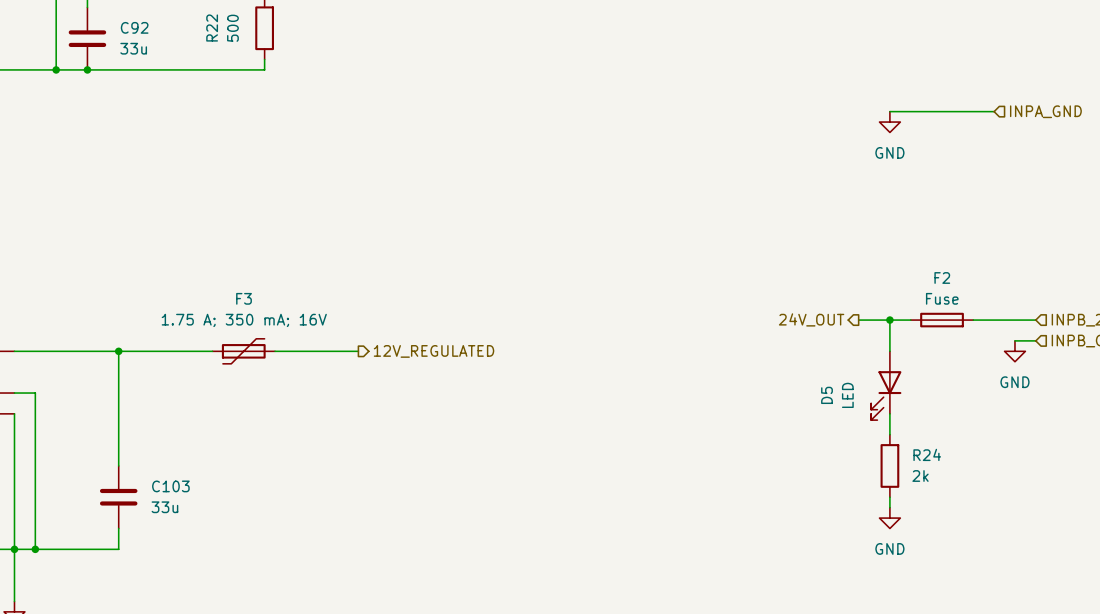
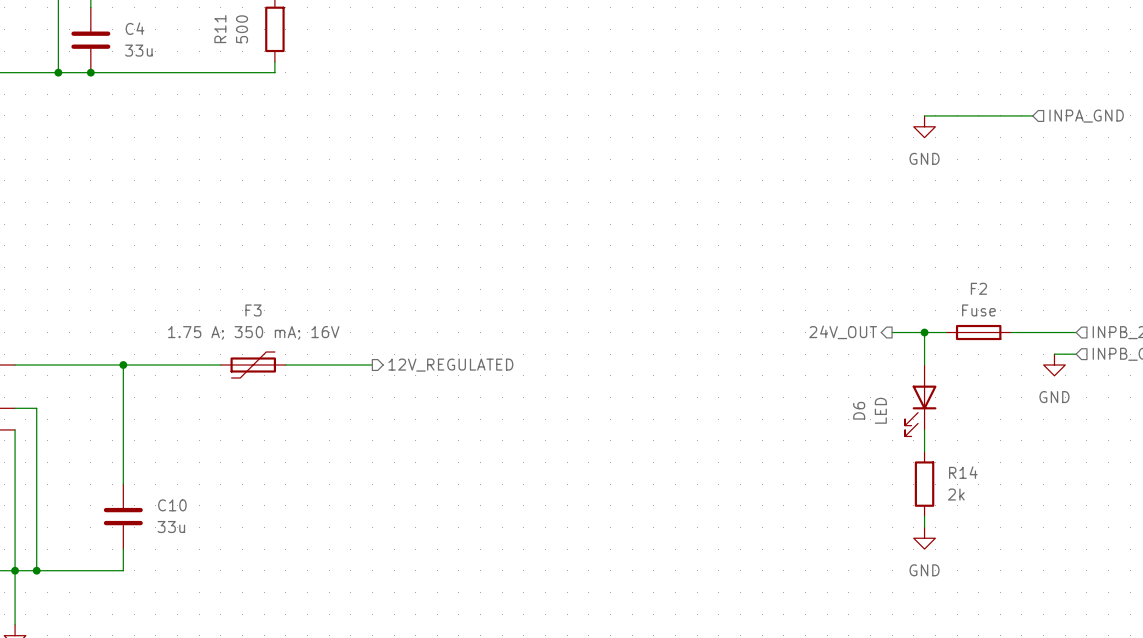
C92 name: C92 (134, 27) -> C4 (135, 28)
R22 name: R22 (212, 28) -> R11 (220, 29)
D5 name: D5 (827, 395) -> D6 (859, 410)
R24 name: R24 (927, 454) -> R14 (963, 472)
C103 name: C103 (170, 486) -> C10 (172, 505)

